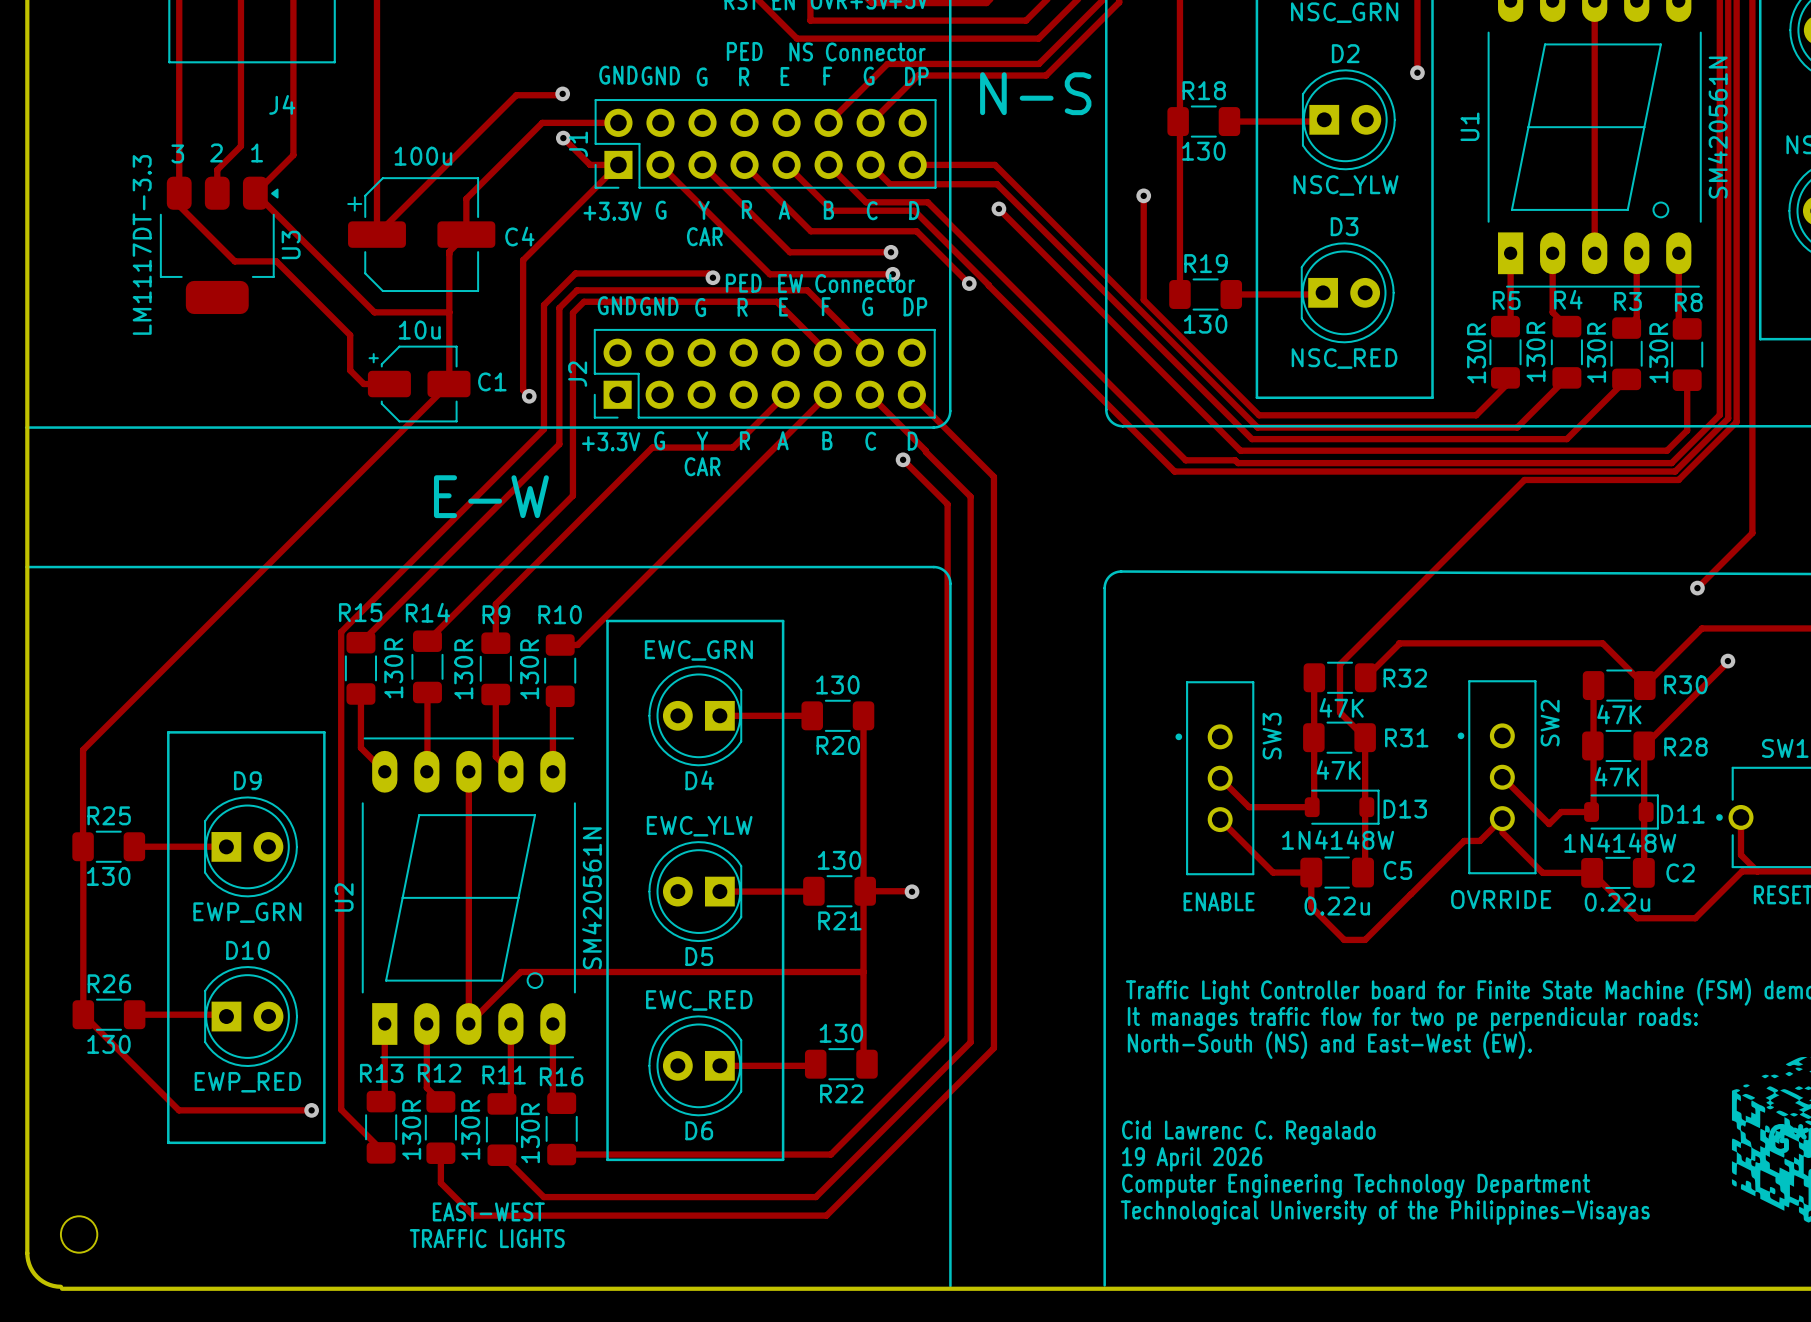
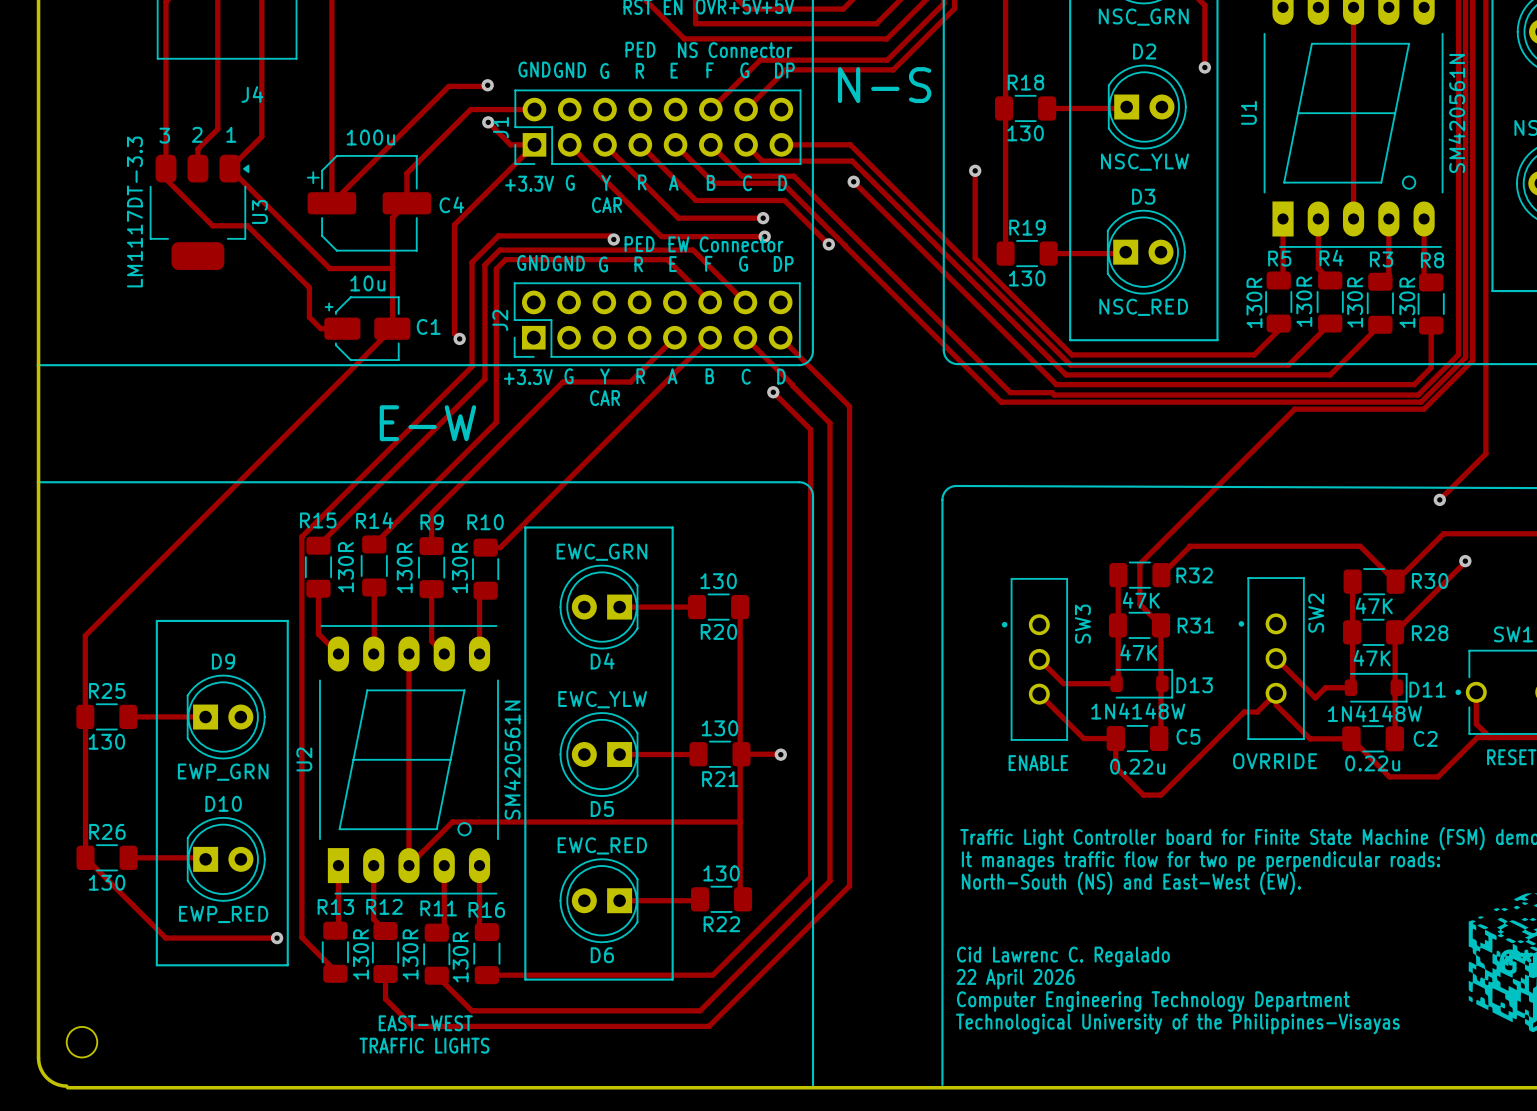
text: 19 April 2026 (1192, 1159) -> 22 April 2026 (1015, 979)

